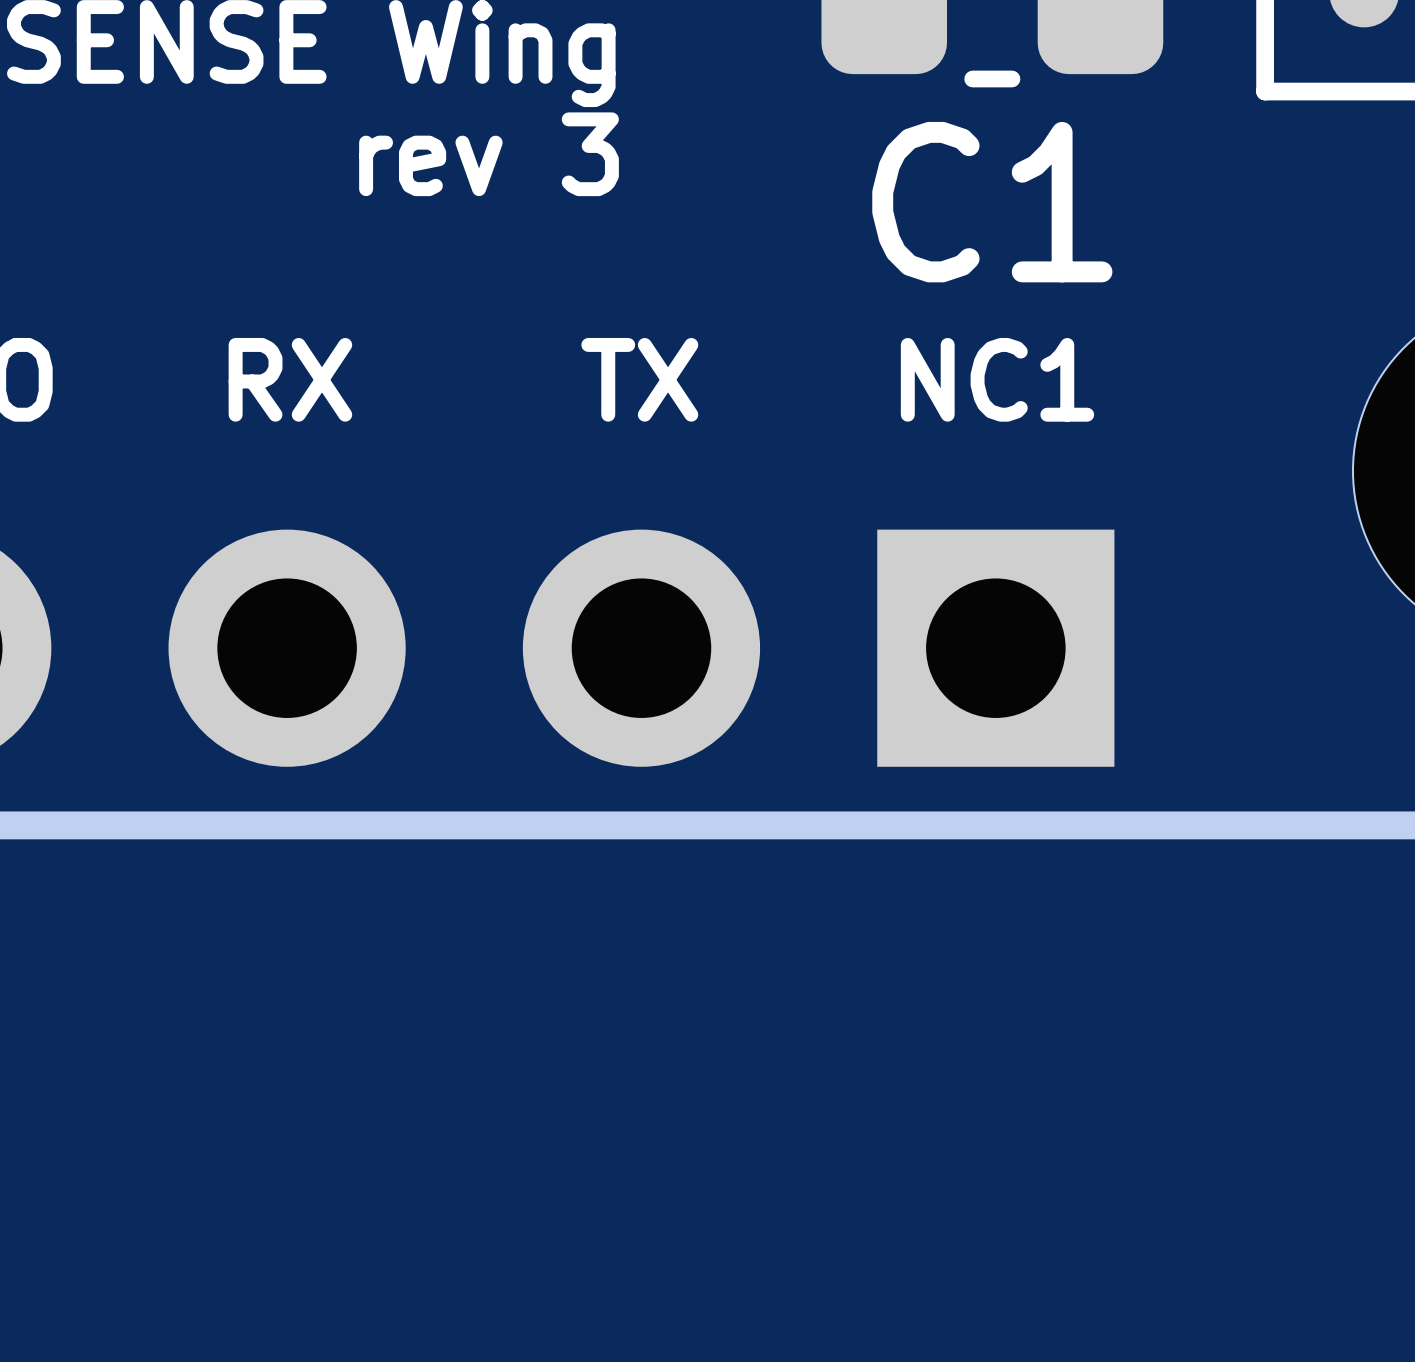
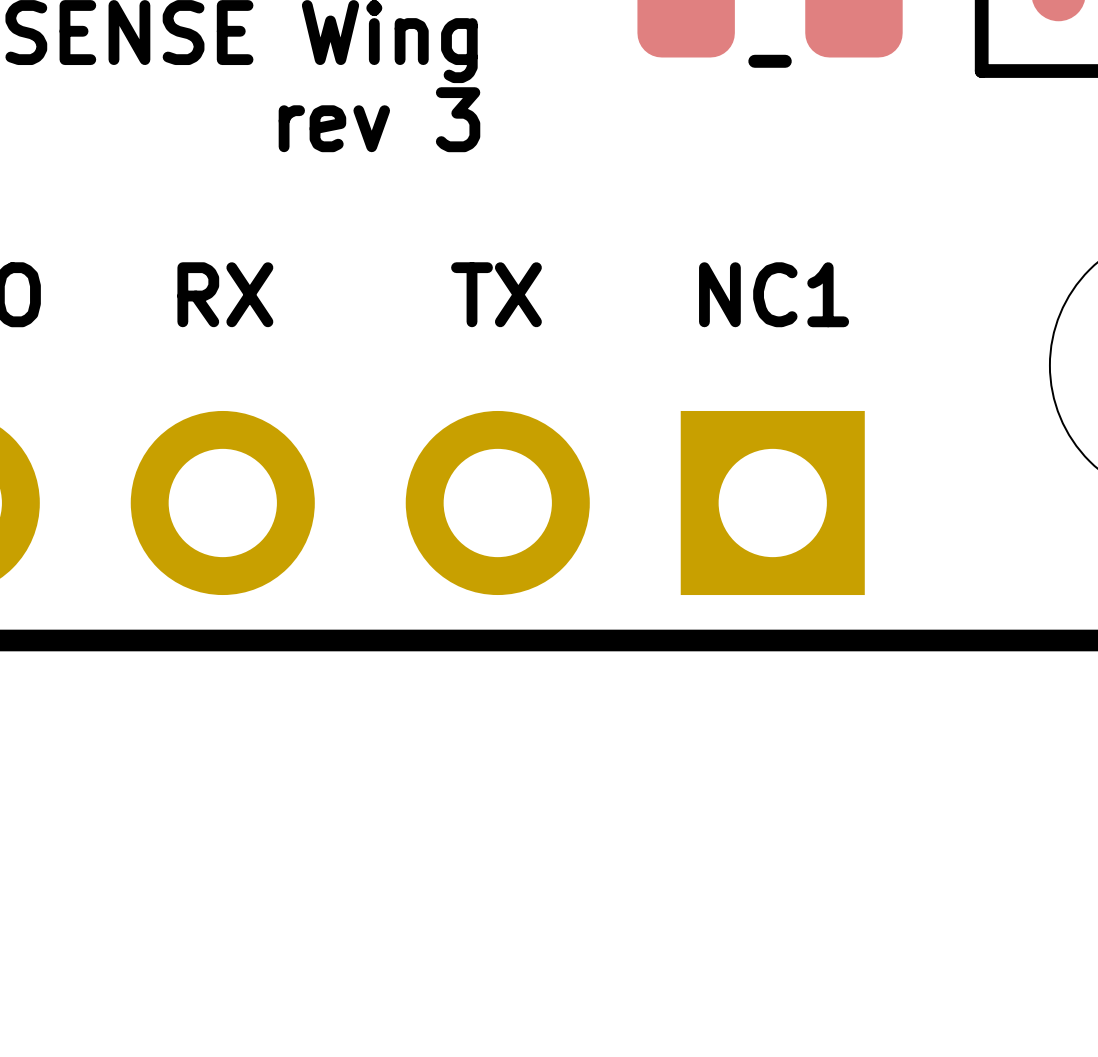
C1 name: C1 (992, 202) -> none

